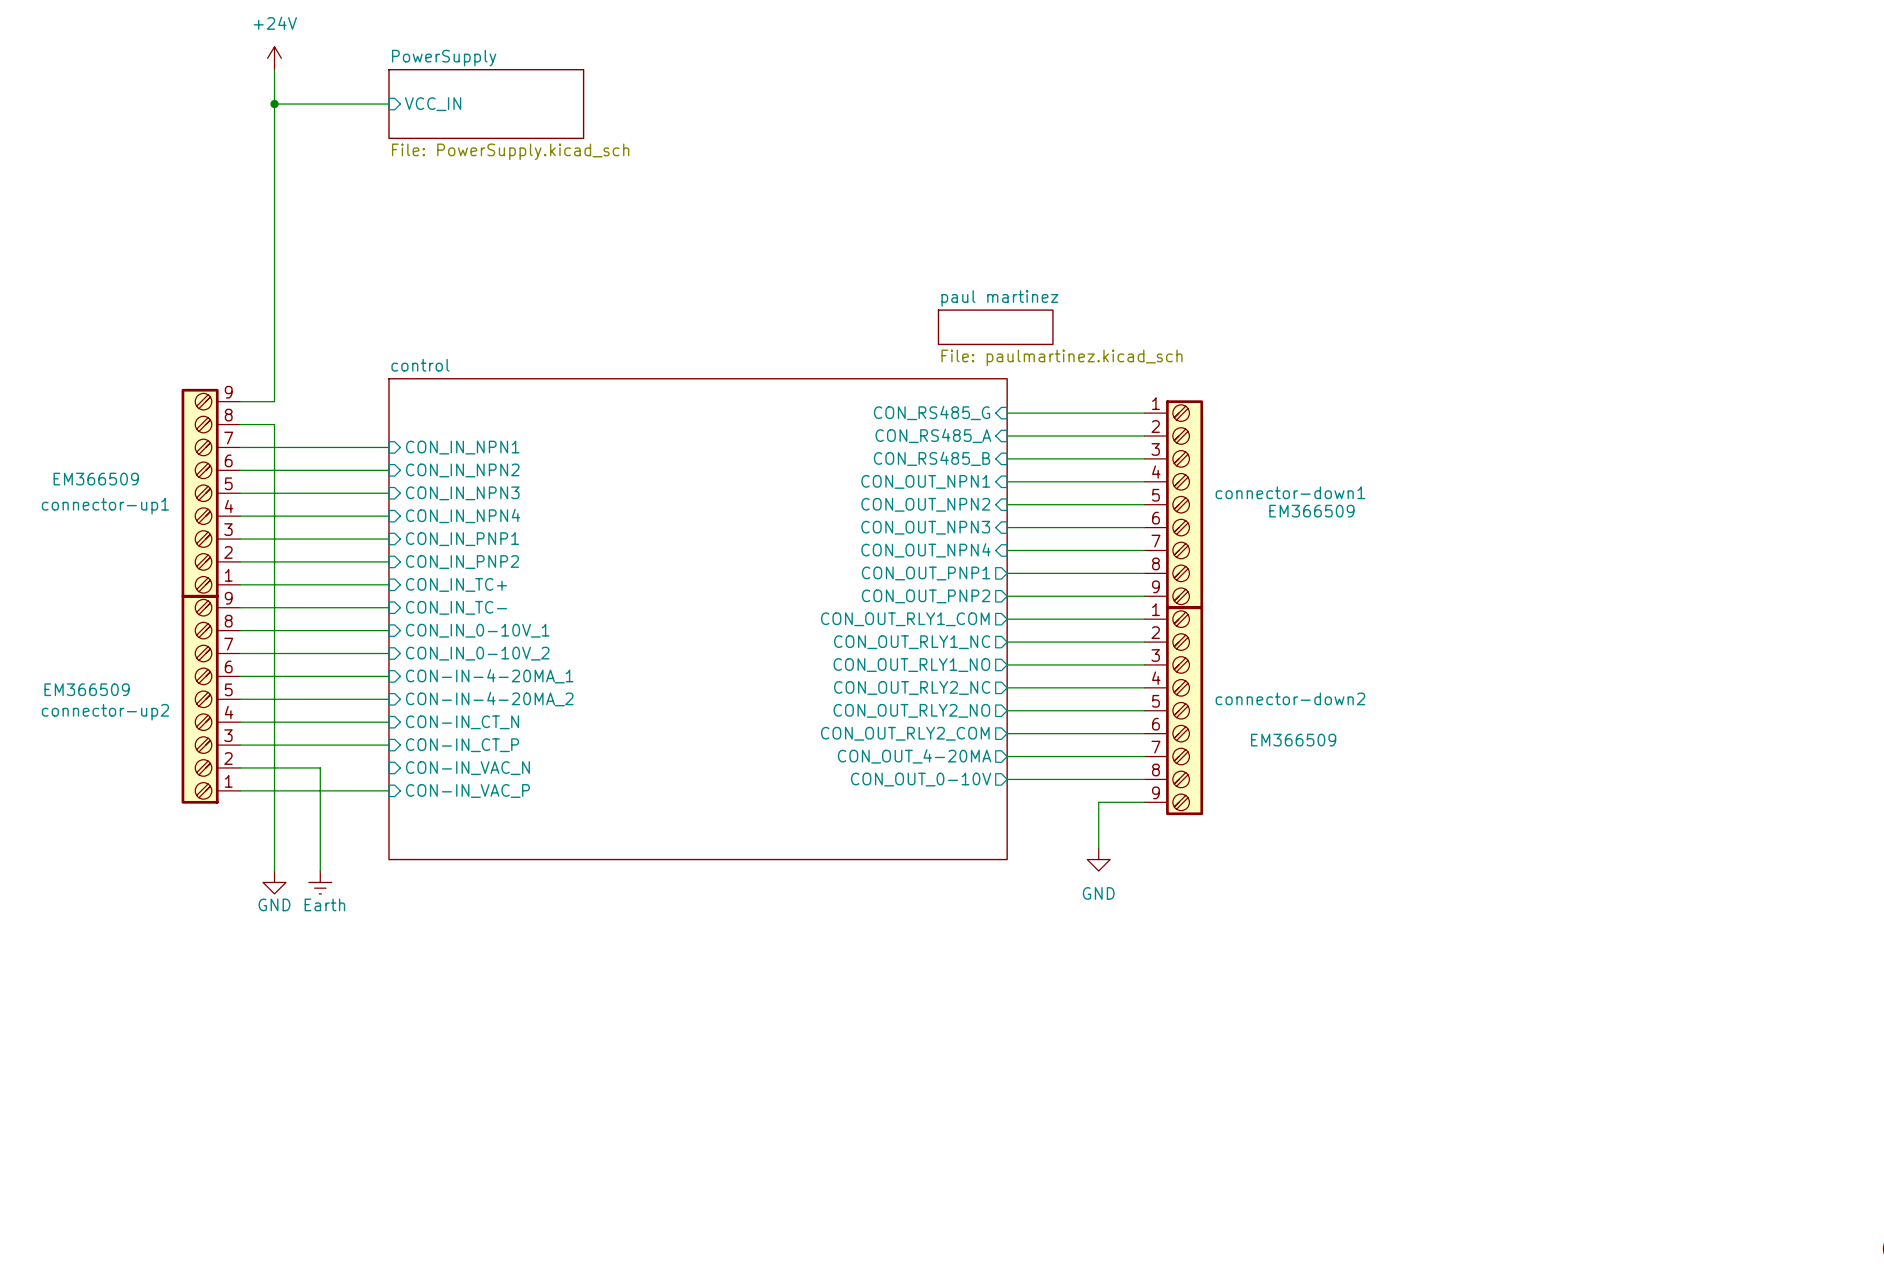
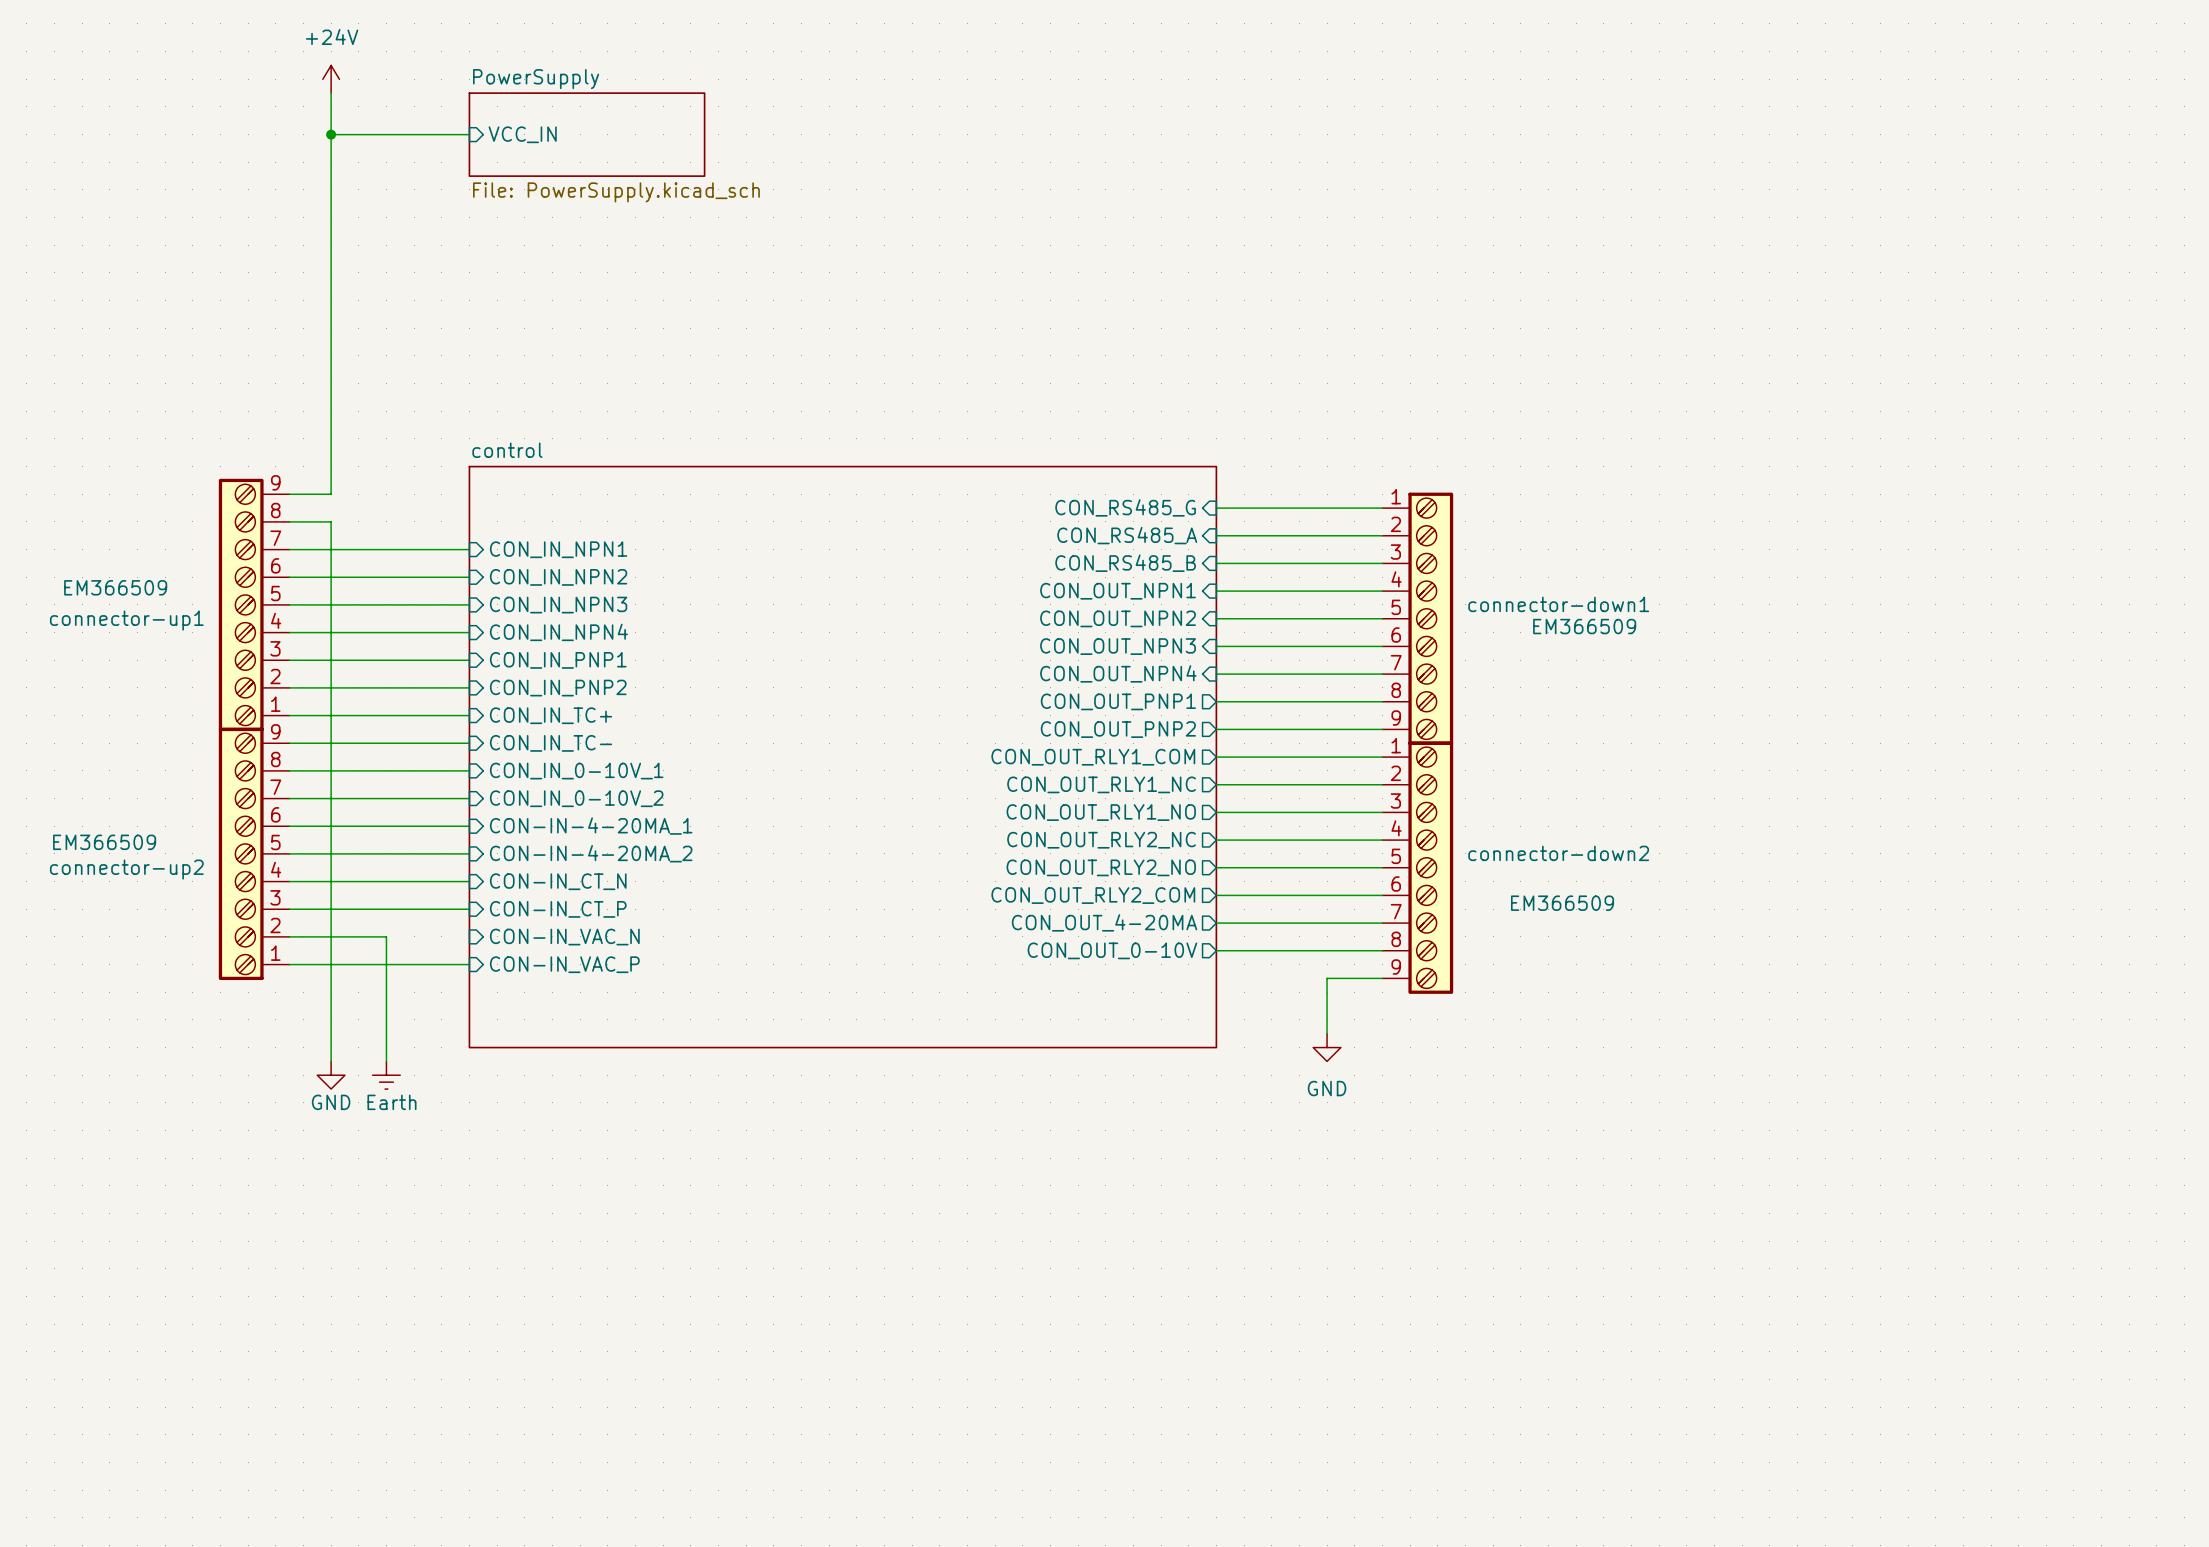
sheet paul martinez: File: paulmartinez.kicad_sch (995, 327) -> none

